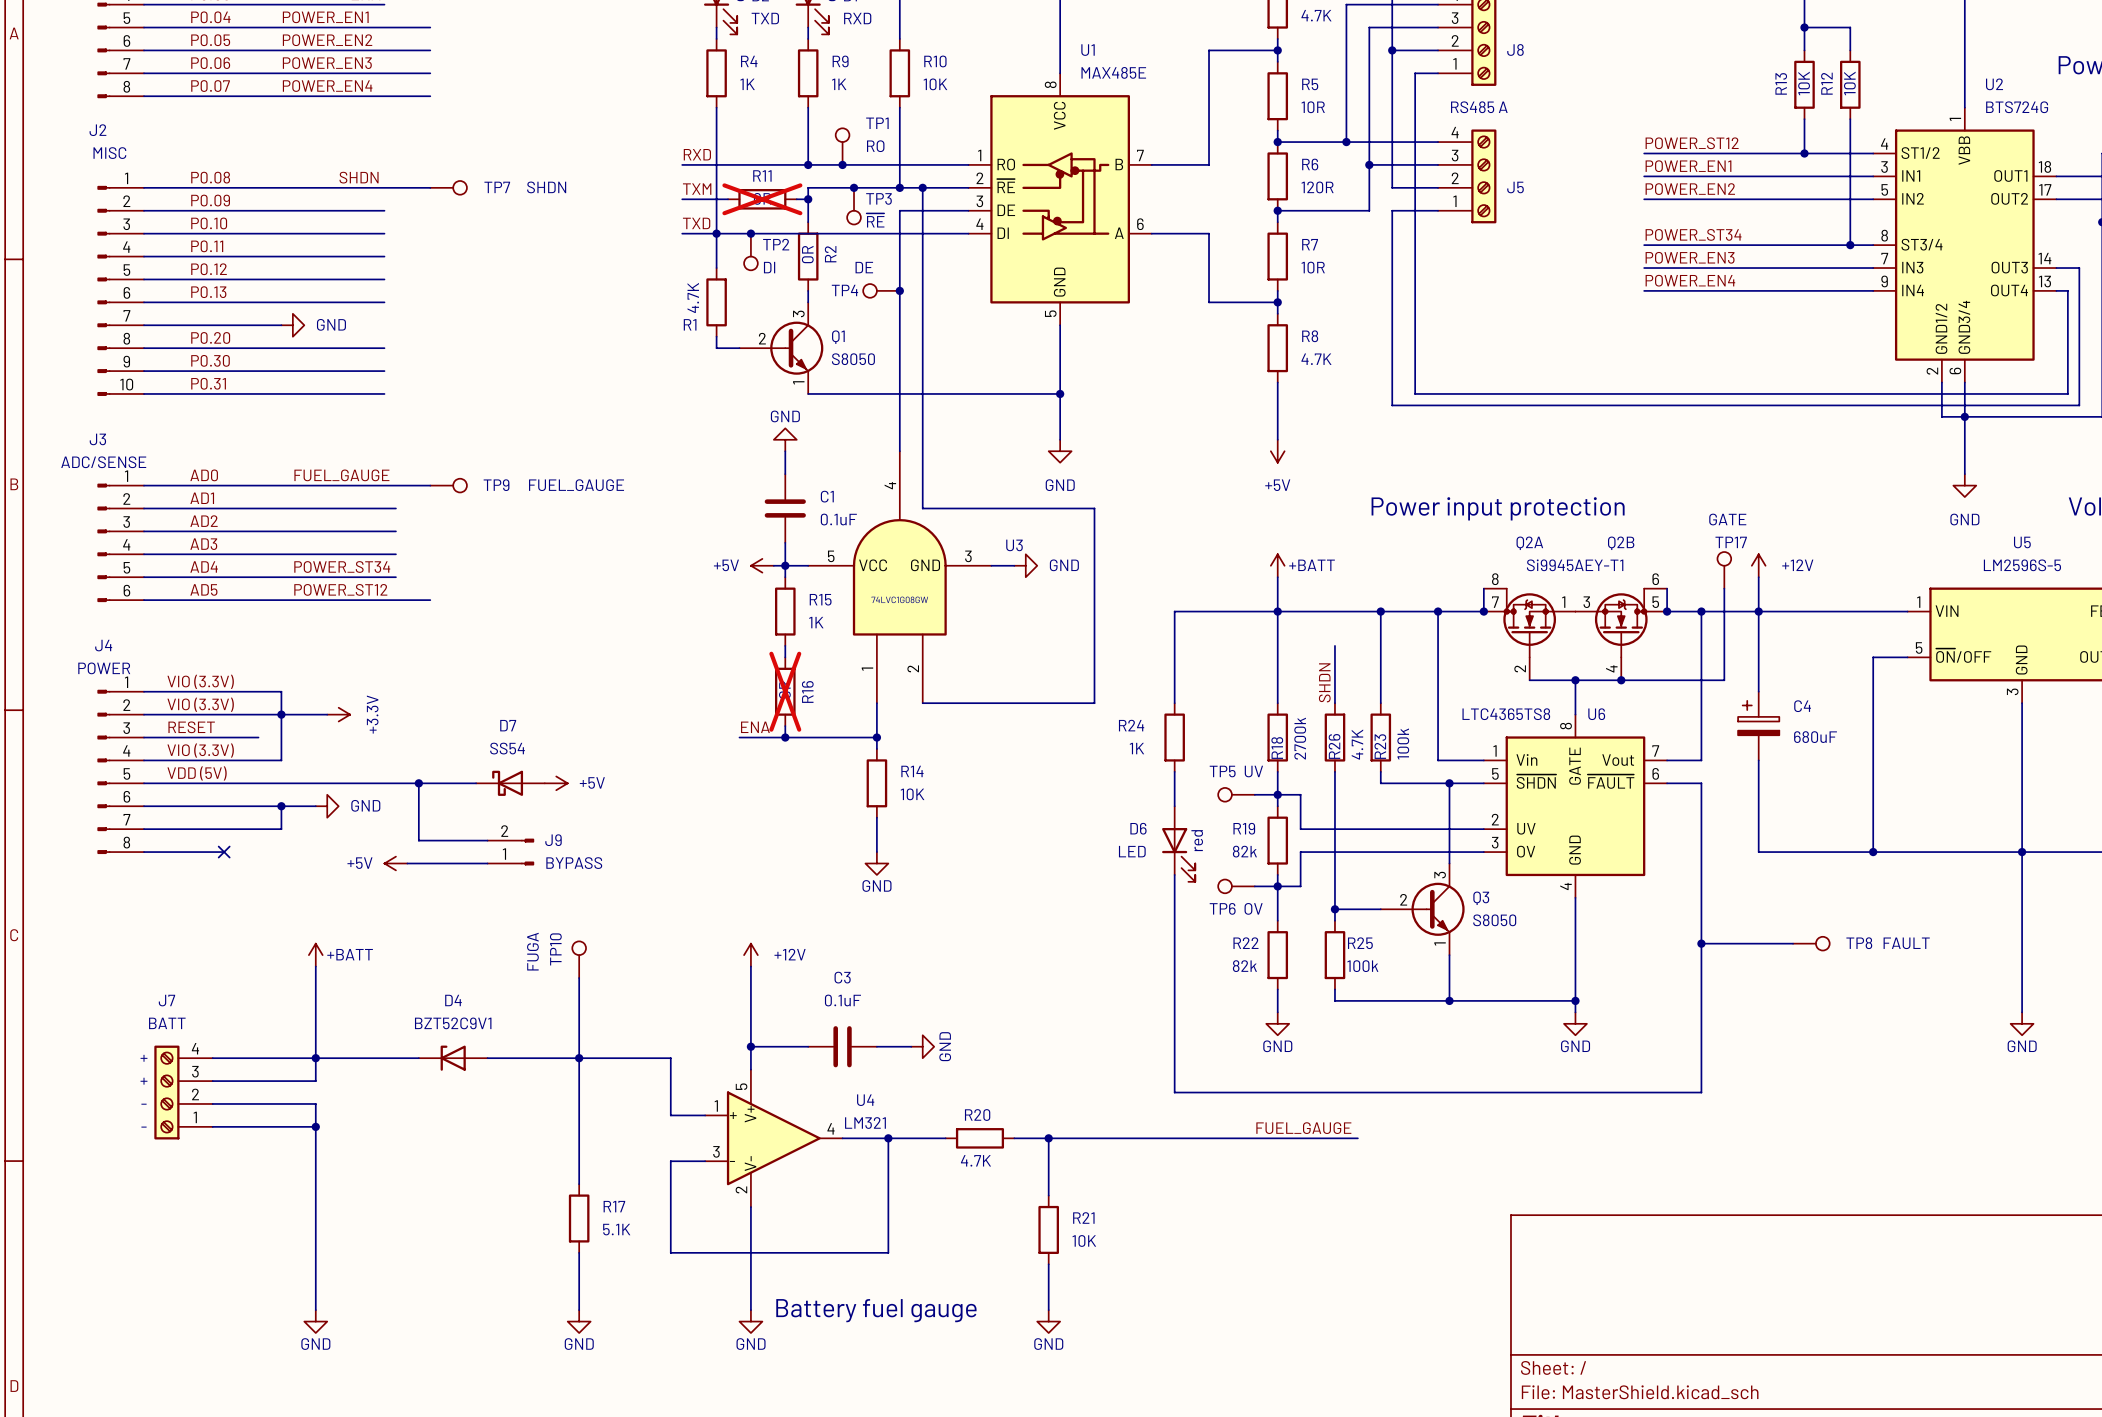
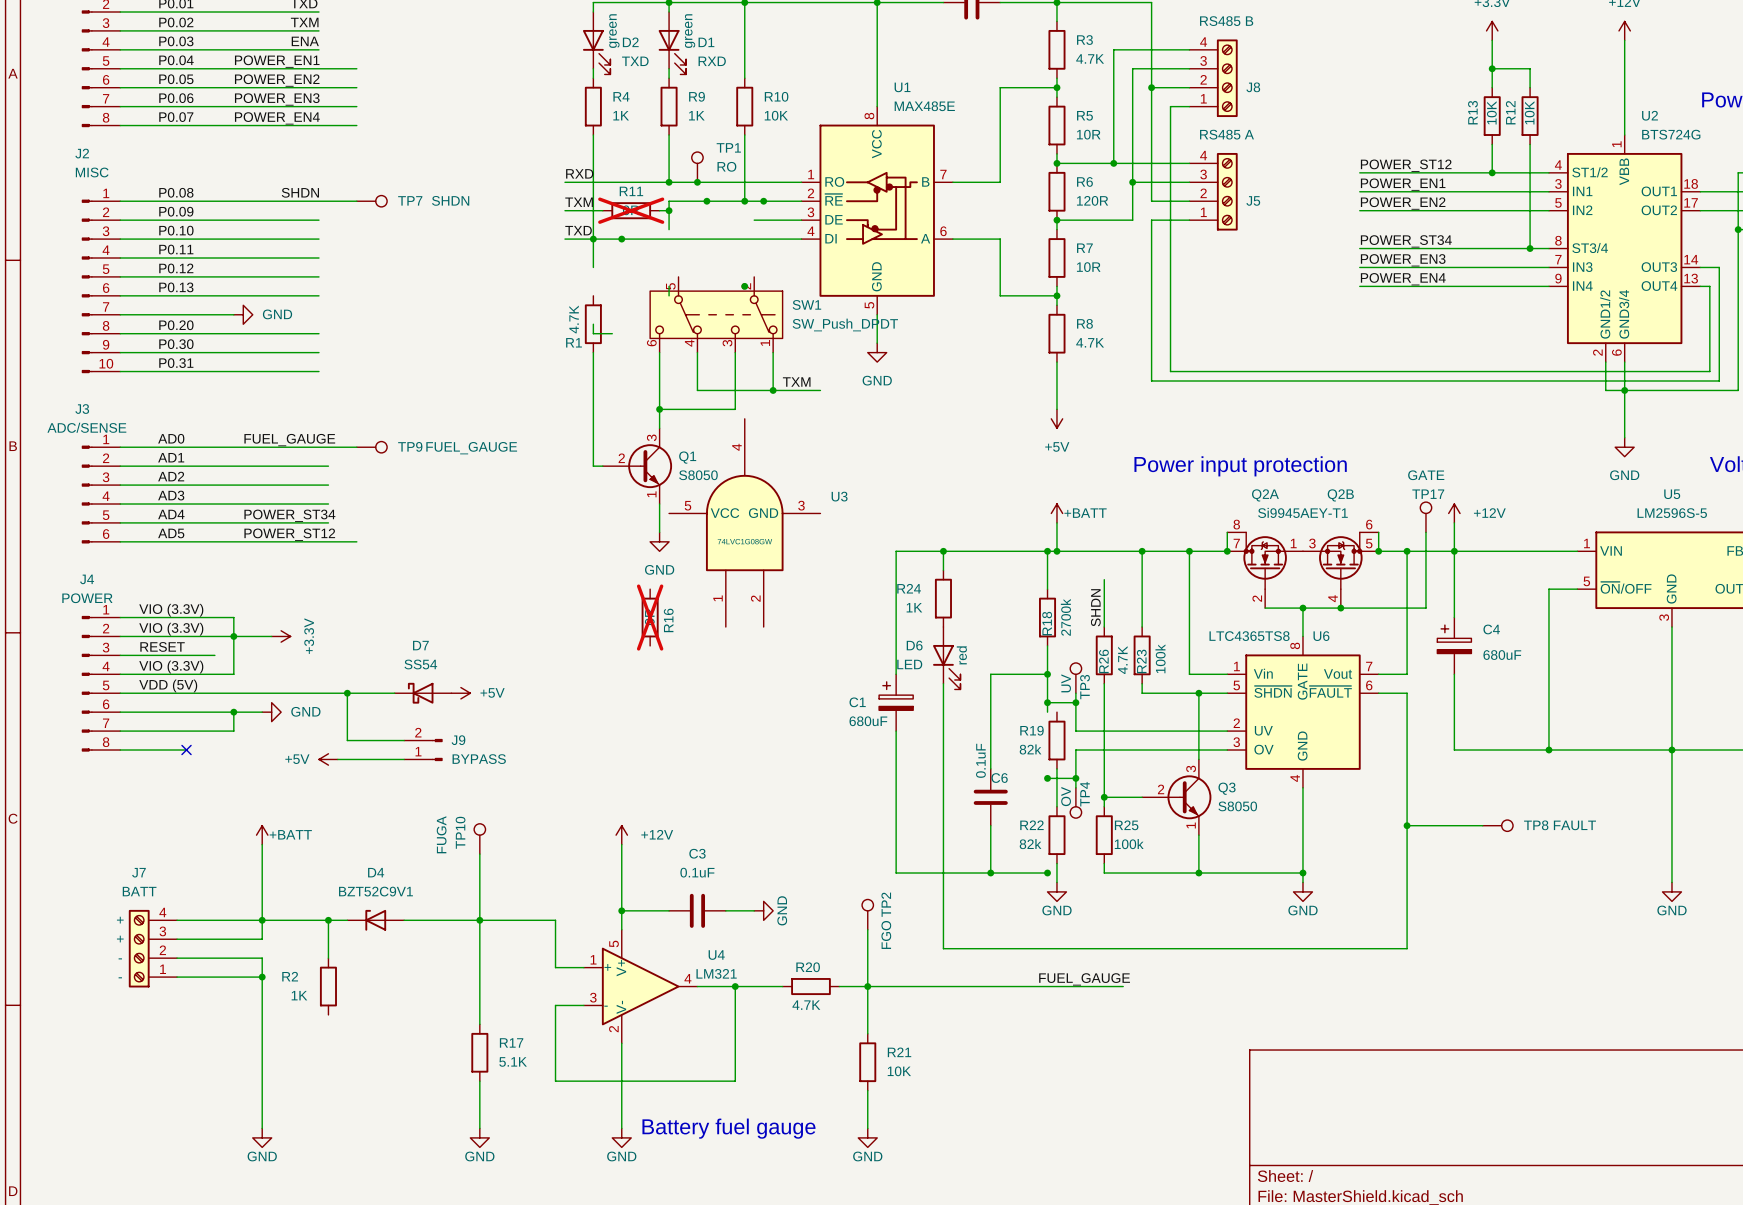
wire: (922, 187) (922, 508) (1094, 508) (1094, 703) (922, 703) -> none
TP3 name position: TP3 (878, 198) -> TP3 (1085, 687)
TP3 position: (854, 206) -> (1075, 678)
wire: (911, 210) (899, 210) (899, 451) -> none
TP3 rotation: 0° (854, 217) -> 180° (1075, 668)
TP3 value: ~{RE} (875, 220) -> UV (1066, 683)
TP2 position: (750, 251) -> (867, 914)
R2 value: 0R (807, 254) -> 1K (299, 995)
R2 name rotation: 0° (830, 254) -> 90° clockwise (290, 976)
R2 name position: R2 (830, 254) -> R2 (290, 976)
R2 position: (808, 256) -> (328, 986)
TP2 rotation: 0° (750, 263) -> 180° (867, 905)
TP2 value: DI (769, 267) -> FGO (886, 934)
TP4 value: DE (864, 267) -> OV (1066, 796)
TP4 name position: TP4 (844, 290) -> TP4 (1085, 794)
TP4 rotation: 0° (870, 290) -> 90° counterclockwise (1075, 812)
TP4 position: (881, 290) -> (1075, 802)
R1 position: (716, 302) -> (593, 324)
SW1: none -> SW_Push_DPDT (716, 314)
Q1 position: (781, 348) -> (637, 466)
wire: (1060, 359) (1060, 439) -> none
wire: none -> (593, 352) (593, 466) (602, 466)
wire: none -> (659, 352) (659, 428)
wire: none -> (697, 352) (697, 390) (820, 390)
wire: none -> (735, 352) (735, 409) (659, 409)
wire: none -> (773, 352) (773, 390)
wire: (808, 393) (1060, 393) -> none
junction: (1060, 393) -> none
label: none -> TXM (796, 382)
junction: none -> (773, 390)
power symbol: GND (785, 439) -> none
junction: none -> (659, 409)
wire: (785, 451) (785, 474) -> none
power symbol position: GND (1060, 451) -> GND (877, 352)
C1 symbol: [764, 474, 806, 543] -> [879, 674, 914, 732]
C1 name position: C1 (827, 496) -> C1 (857, 702)
C1 value: 0.1uF (838, 519) -> 680uF (868, 721)
wire: (785, 542) (785, 577) -> (659, 504) (659, 532)
power symbol: +5V (762, 565) -> none
wire: (773, 565) (808, 565) -> none
junction: (785, 565) -> none
wire: (991, 565) (1014, 565) -> none
power symbol: GND (1025, 565) -> none
power symbol: none -> GND (659, 541)
R15: 1K (785, 611) -> none
wire: none -> (943, 551) (943, 570)
junction: none -> (943, 551)
wire: (1174, 611) (1174, 703) -> (971, 551) (896, 551) (896, 674)
wire: none -> (1047, 551) (1047, 589)
junction: none -> (1047, 551)
wire: (1277, 611) (1277, 703) -> none
wire: (785, 645) (785, 657) -> none
wire: (876, 703) (876, 748) -> none
wire: (785, 726) (785, 737) -> none
wire: none -> (1047, 645) (1047, 712)
label: ENA (755, 727) -> none
wire: (739, 737) (876, 737) -> none
junction: (785, 737) -> none
junction: (876, 737) -> none
R24 position: (1174, 737) -> (943, 598)
R18 position: (1277, 737) -> (1047, 617)
wire: none -> (1047, 674) (990, 674) (990, 768)
junction: none -> (1047, 674)
wire: (1174, 771) (1174, 806) -> none
wire: (1277, 771) (1277, 806) -> none
R14: 10K (876, 783) -> none
wire: none -> (1075, 693) (1075, 702)
TP5: UV (1236, 794) -> none
wire: (1254, 794) (1266, 794) -> none
junction: none -> (1047, 702)
junction: (1277, 794) -> none
junction: none -> (1075, 702)
wire: (876, 817) (876, 852) -> none
wire: none -> (896, 731) (896, 873) (1047, 873)
D6 position: (1178, 844) -> (946, 658)
power symbol: GND (876, 863) -> none
wire: (1174, 874) (1174, 1092) -> (943, 683) (943, 948) (971, 948)
TP6: OV (1236, 886) -> none
wire: (1254, 886) (1266, 886) -> none
junction: none -> (1047, 778)
junction: (1277, 886) -> none
wire: none -> (1075, 778) (1075, 787)
junction: none -> (1075, 778)
C6: none -> 0.1uF (990, 797)
wire: none -> (990, 825) (990, 873)
junction: none -> (990, 873)
junction: none -> (1047, 873)
wire: none -> (328, 920) (328, 958)
junction: none -> (328, 920)
wire: none -> (867, 929) (867, 986)

